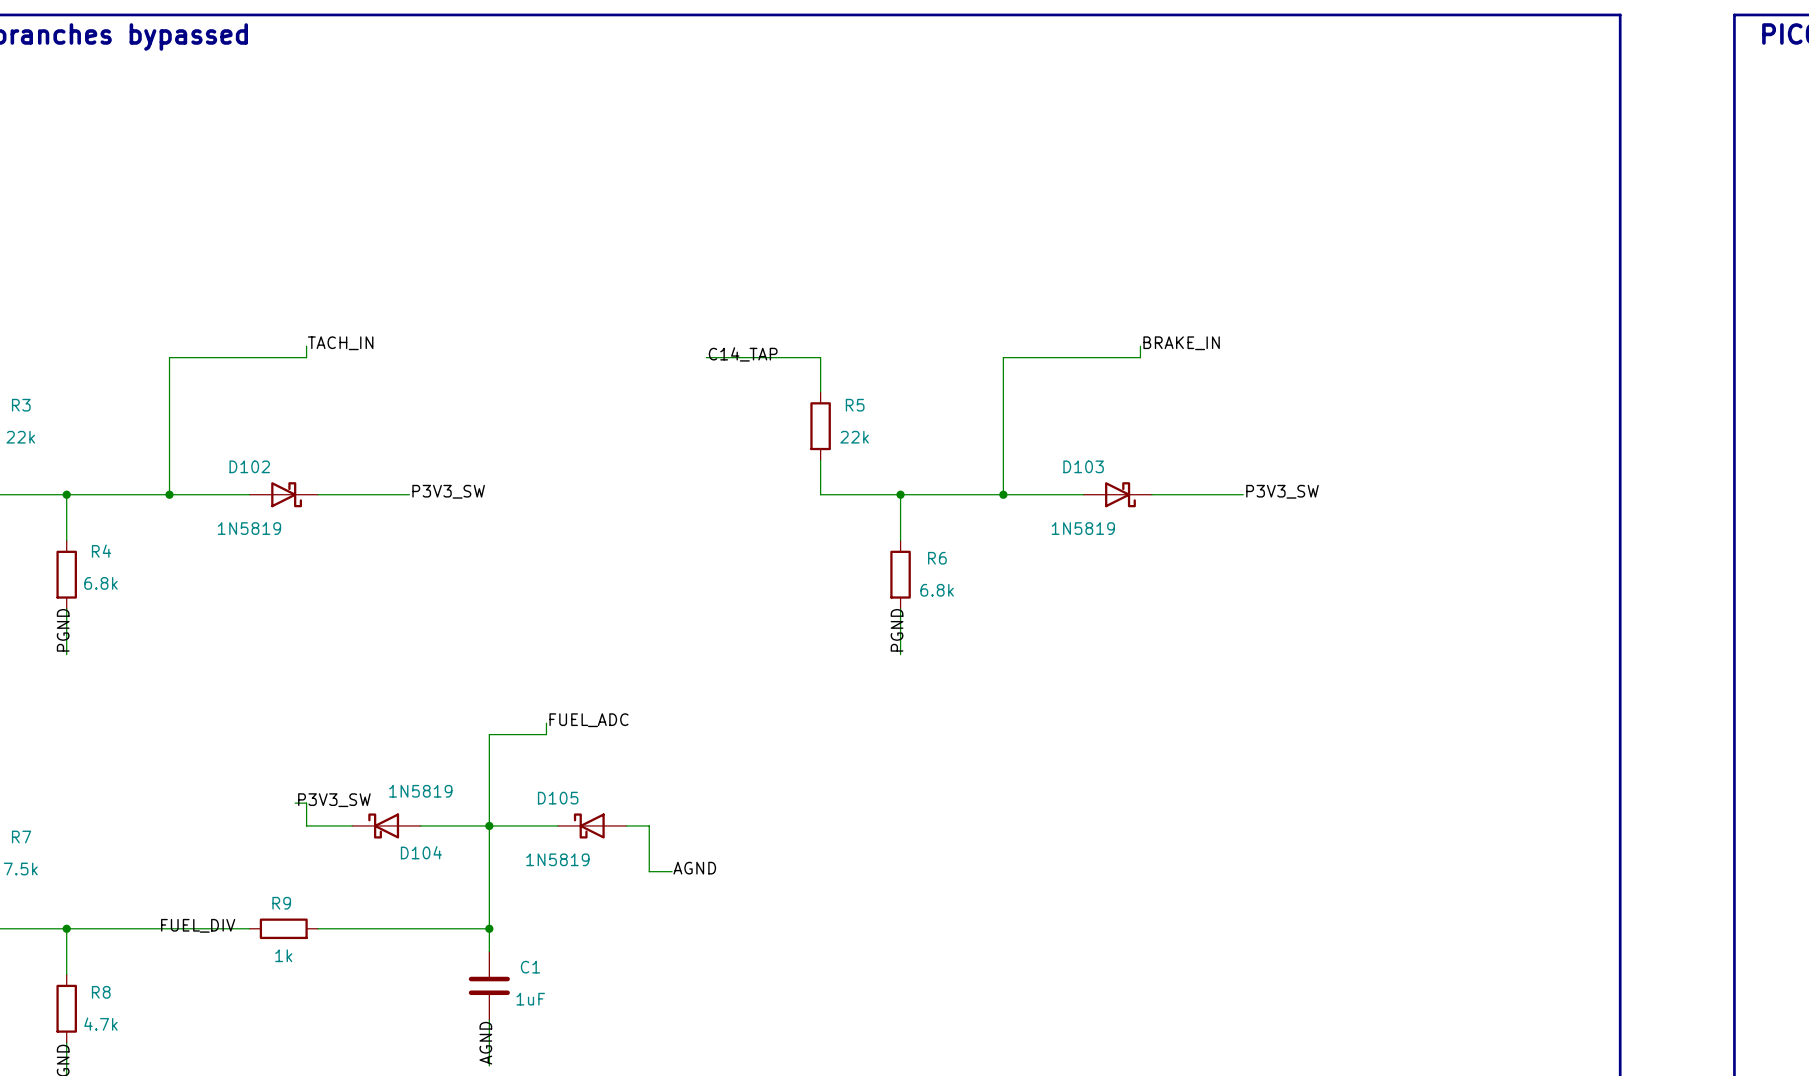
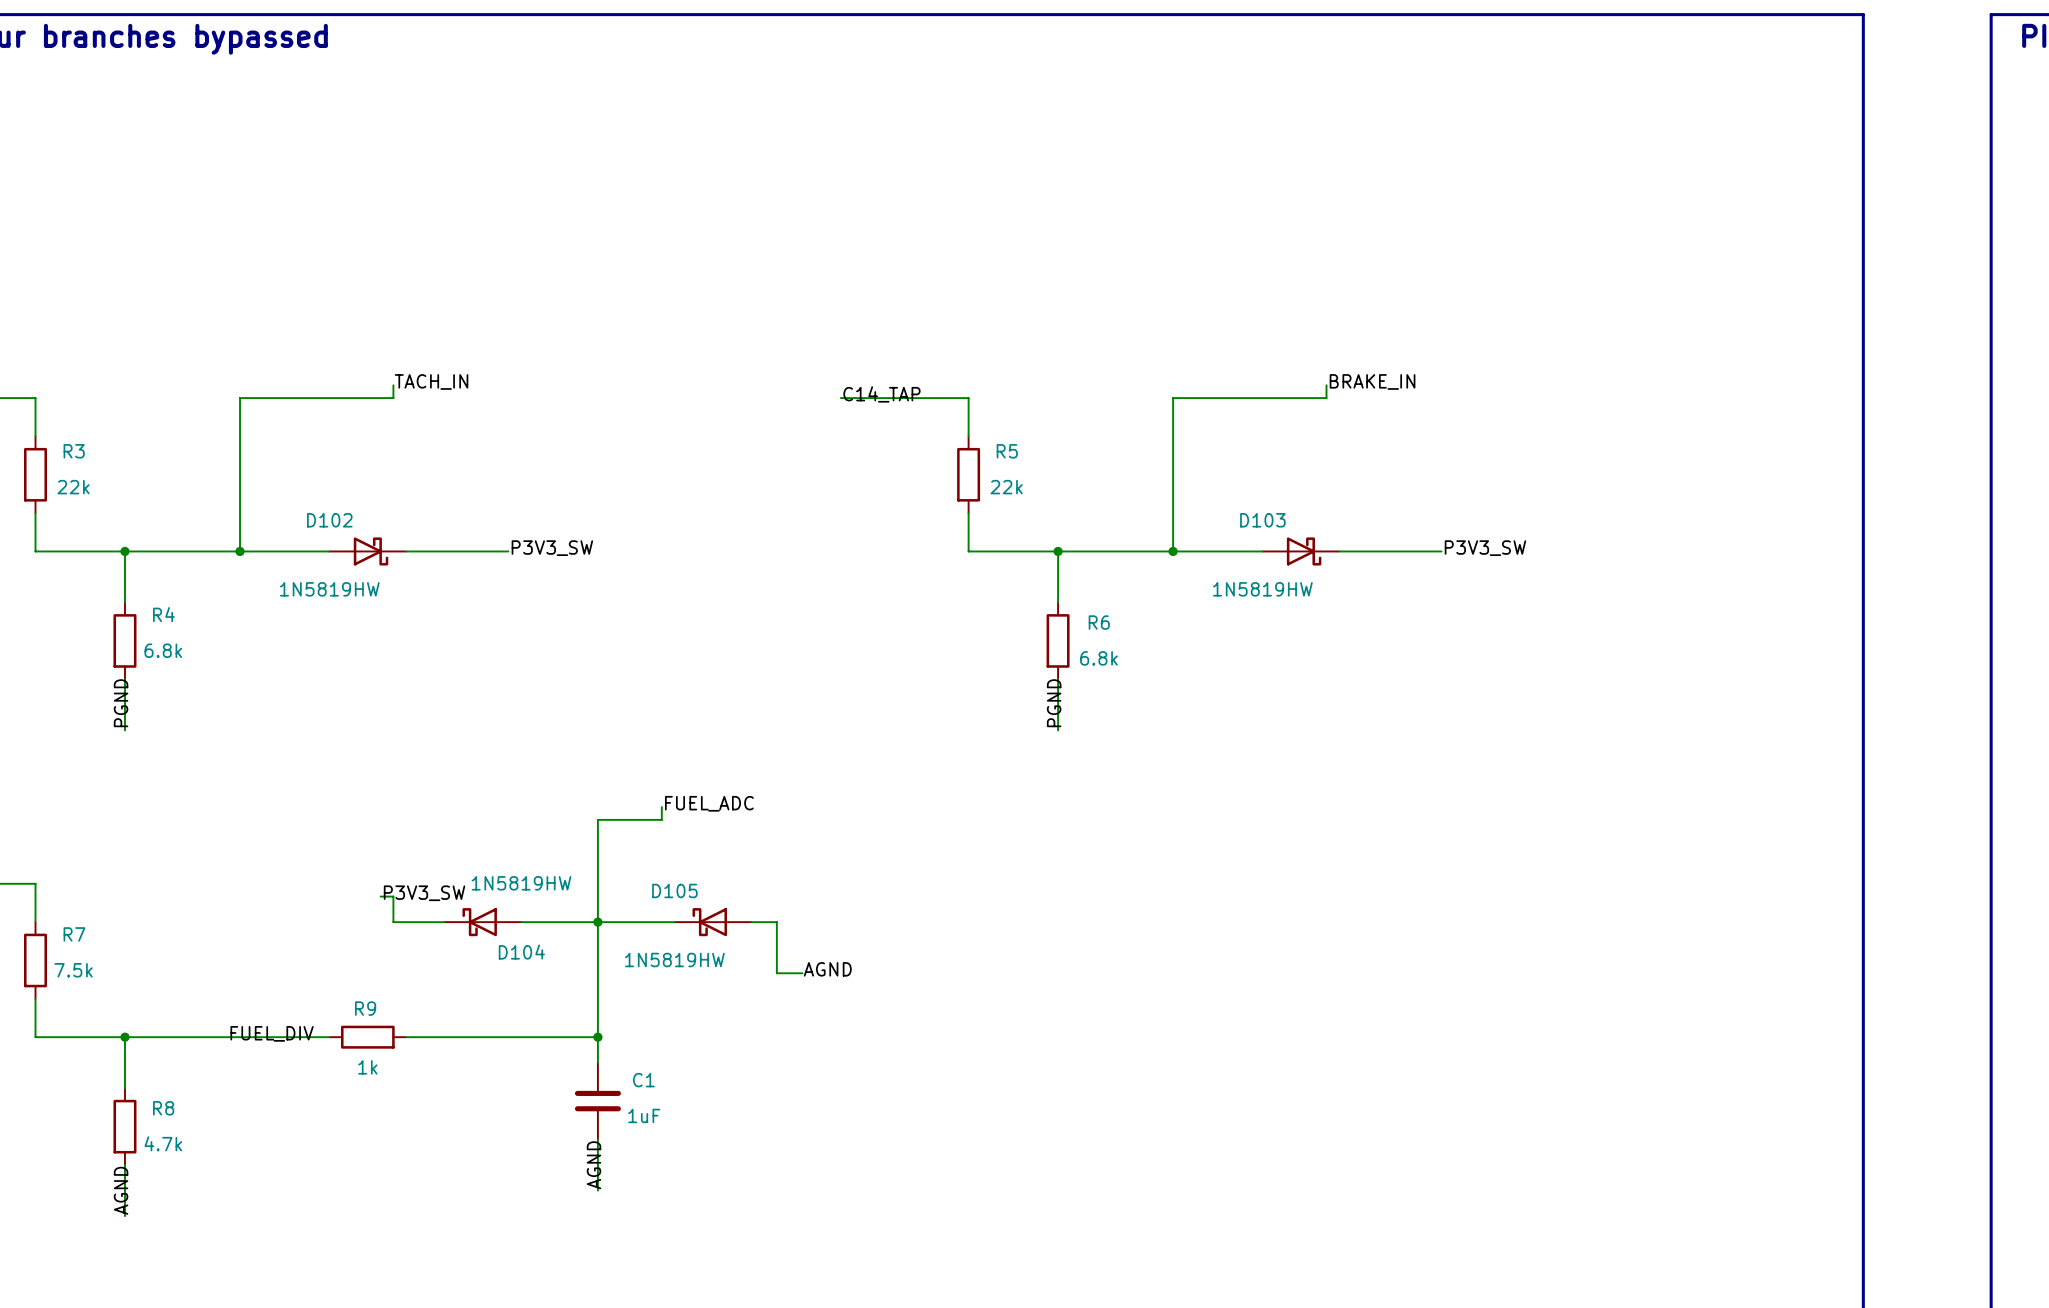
D102 value: 1N5819 (249, 528) -> 1N5819HW (329, 589)
D103 value: 1N5819 (1083, 528) -> 1N5819HW (1262, 589)
D104 value: 1N5819 (420, 791) -> 1N5819HW (521, 883)
D105 value: 1N5819 (557, 859) -> 1N5819HW (674, 960)

